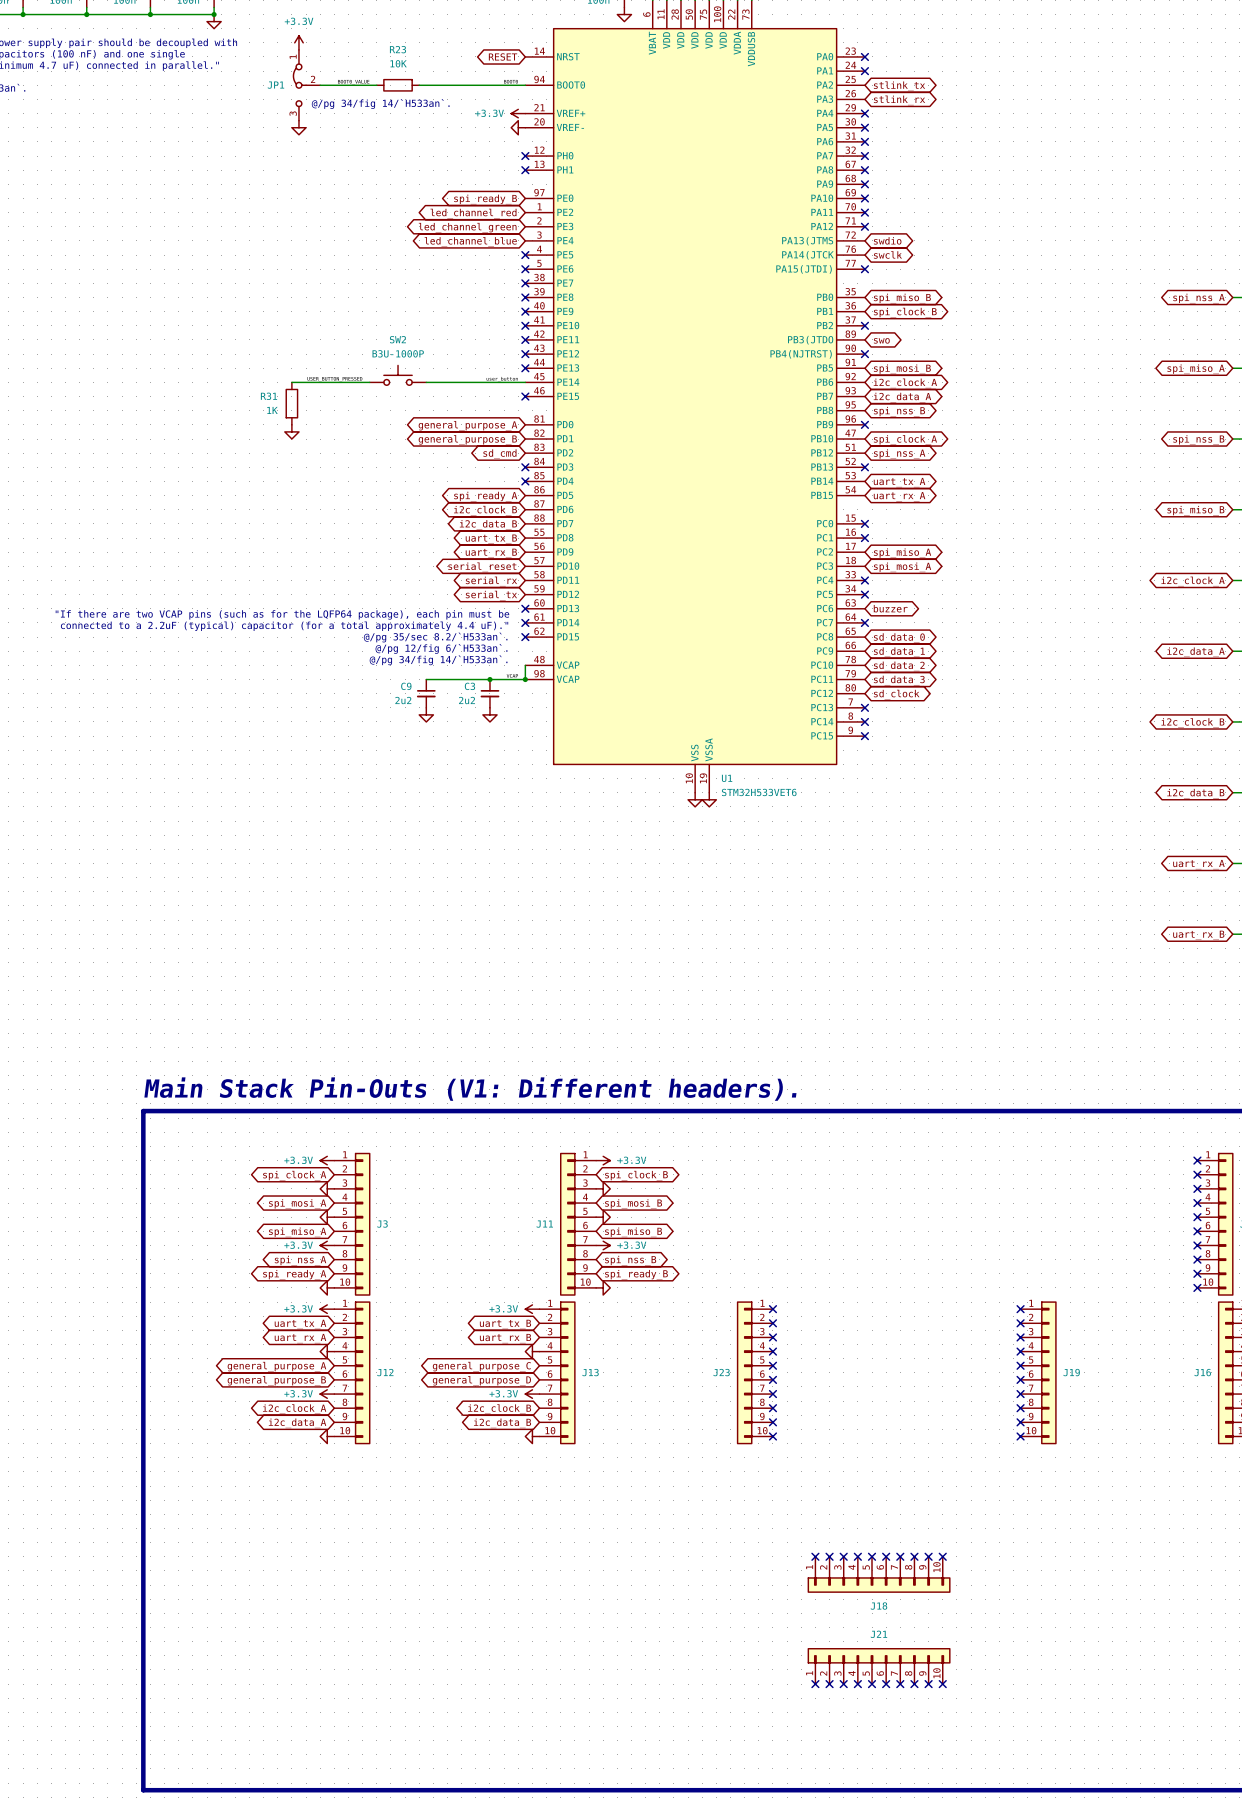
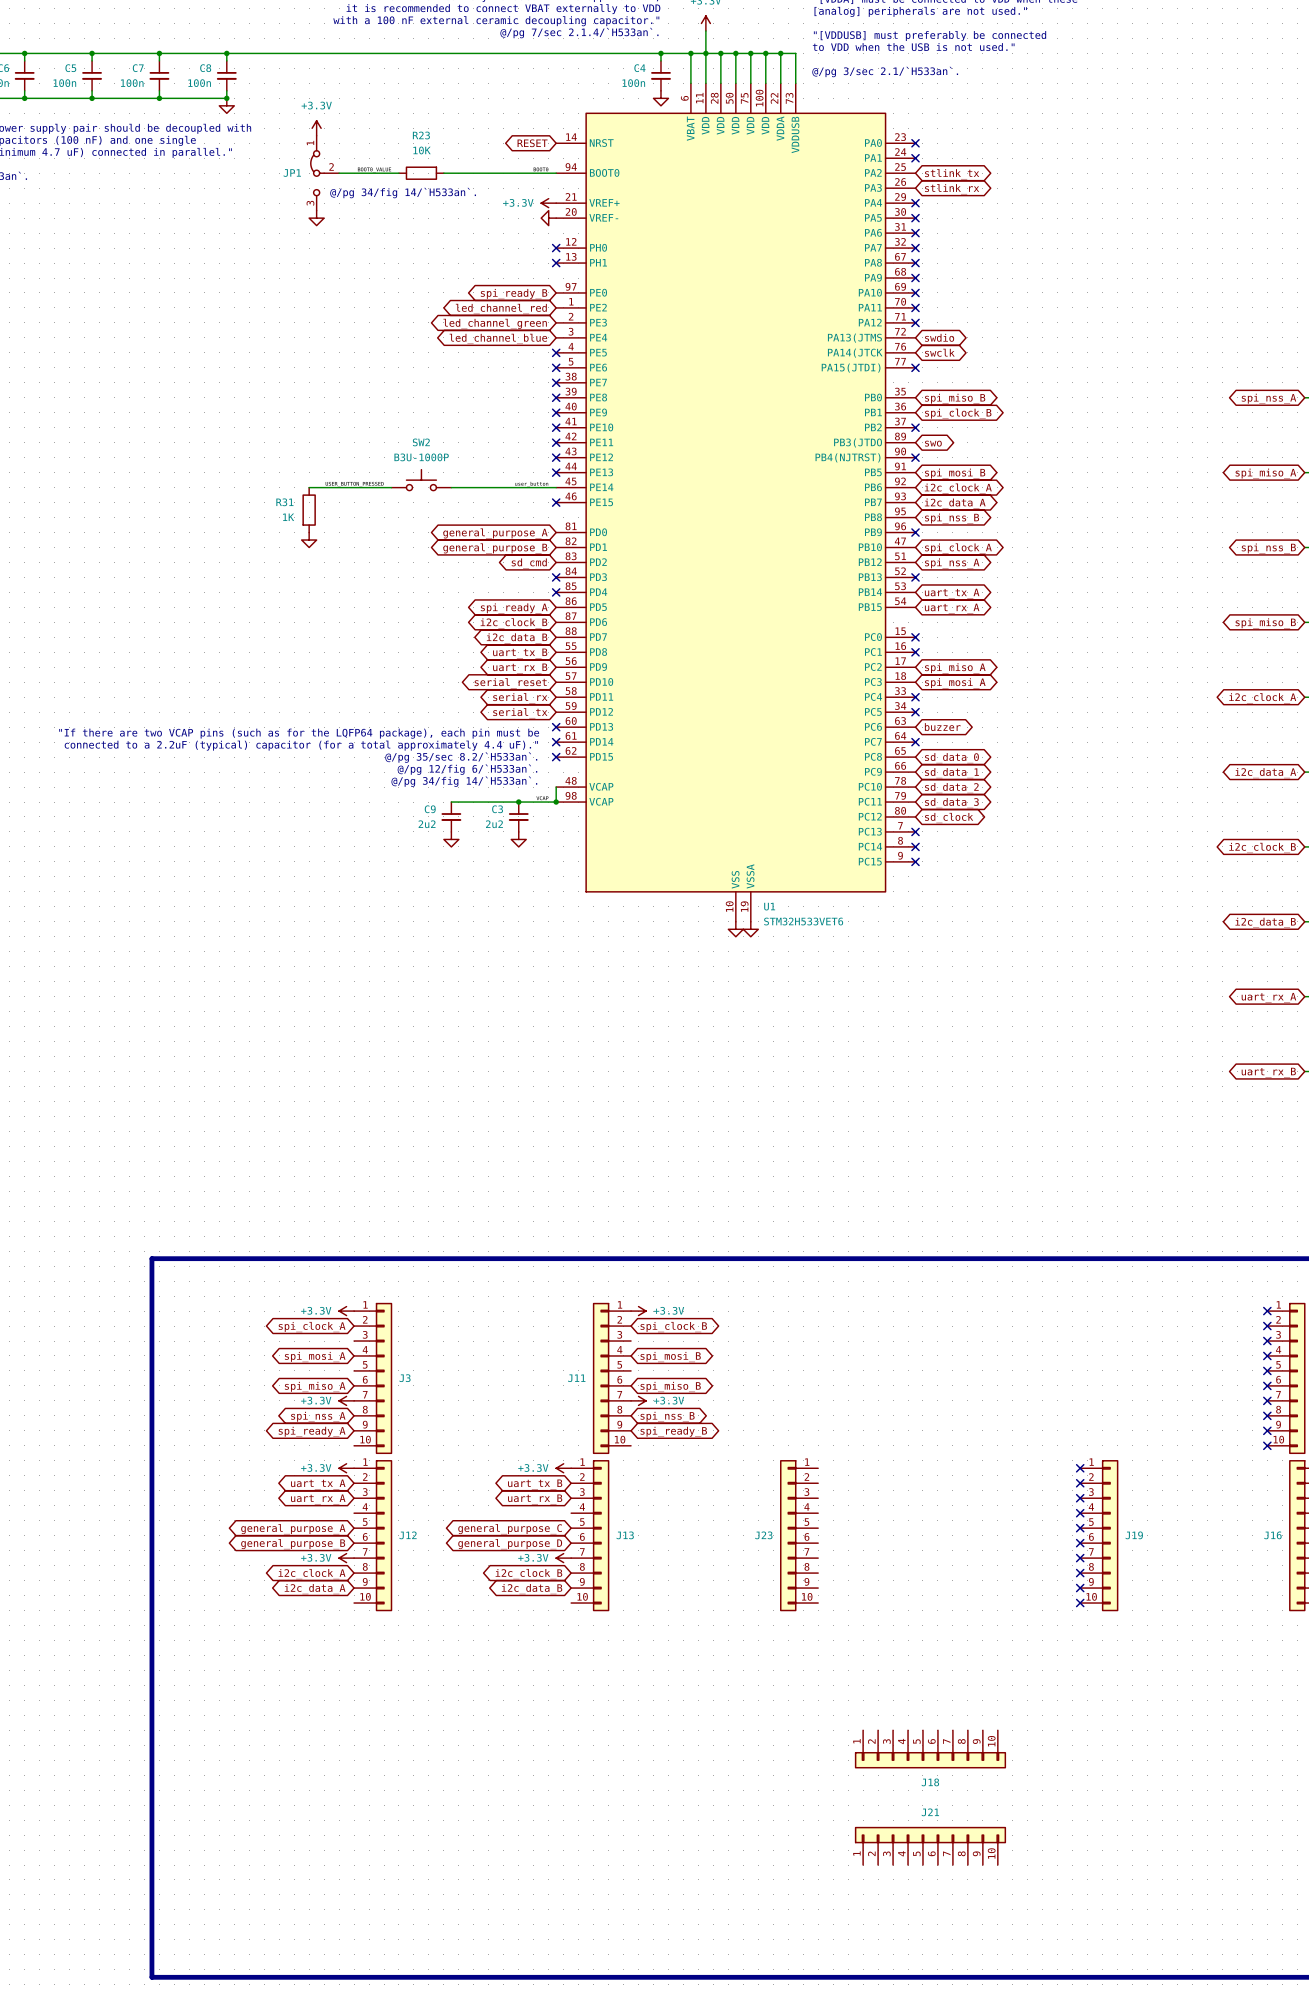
text: Main Stack Pin-Outs (V1: Different headers). (470, 1089) -> none
power symbol: (327, 1188) -> none
power symbol: (603, 1188) -> none
power symbol: (327, 1217) -> none
power symbol: (603, 1217) -> none
power symbol: (327, 1287) -> none
power symbol: (603, 1287) -> none
no-connect mark: (772, 1309) -> none
no-connect mark: (772, 1323) -> none
no-connect mark: (772, 1337) -> none
power symbol: (327, 1351) -> none
power symbol: (532, 1351) -> none
no-connect mark: (772, 1351) -> none
no-connect mark: (772, 1365) -> none
no-connect mark: (772, 1379) -> none
no-connect mark: (772, 1394) -> none
no-connect mark: (772, 1408) -> none
no-connect mark: (772, 1422) -> none
power symbol: (327, 1436) -> none
power symbol: (532, 1436) -> none
no-connect mark: (772, 1436) -> none
no-connect mark: (815, 1556) -> none
no-connect mark: (829, 1556) -> none
no-connect mark: (843, 1556) -> none
no-connect mark: (857, 1556) -> none
no-connect mark: (872, 1556) -> none
no-connect mark: (886, 1556) -> none
no-connect mark: (900, 1556) -> none
no-connect mark: (914, 1556) -> none
no-connect mark: (928, 1556) -> none
no-connect mark: (942, 1556) -> none
no-connect mark: (815, 1684) -> none
no-connect mark: (829, 1684) -> none
no-connect mark: (843, 1684) -> none
no-connect mark: (857, 1684) -> none
no-connect mark: (872, 1684) -> none
no-connect mark: (886, 1684) -> none
no-connect mark: (900, 1684) -> none
no-connect mark: (914, 1684) -> none
no-connect mark: (928, 1684) -> none
no-connect mark: (942, 1684) -> none

